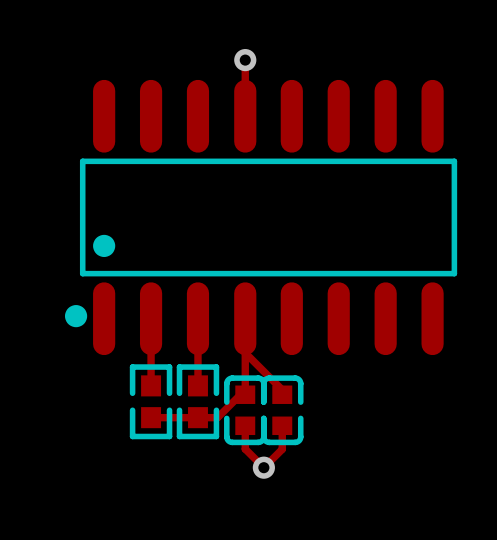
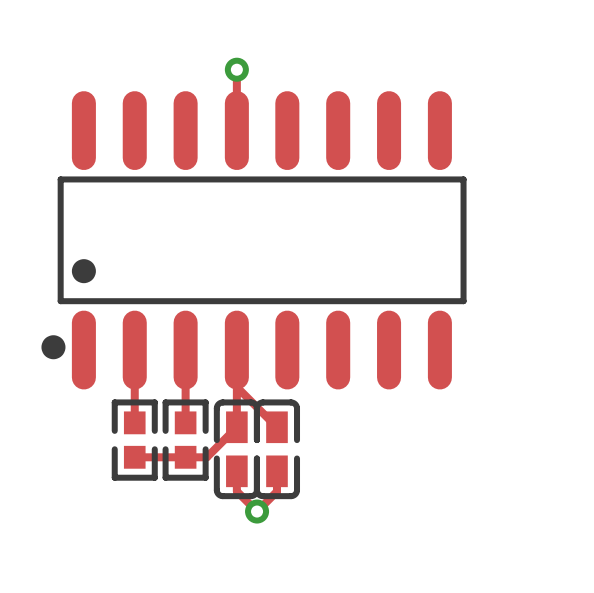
part footprint: [224, 375, 267, 446] -> [213, 399, 260, 500]
part footprint: [261, 375, 304, 446] -> [253, 399, 301, 500]

